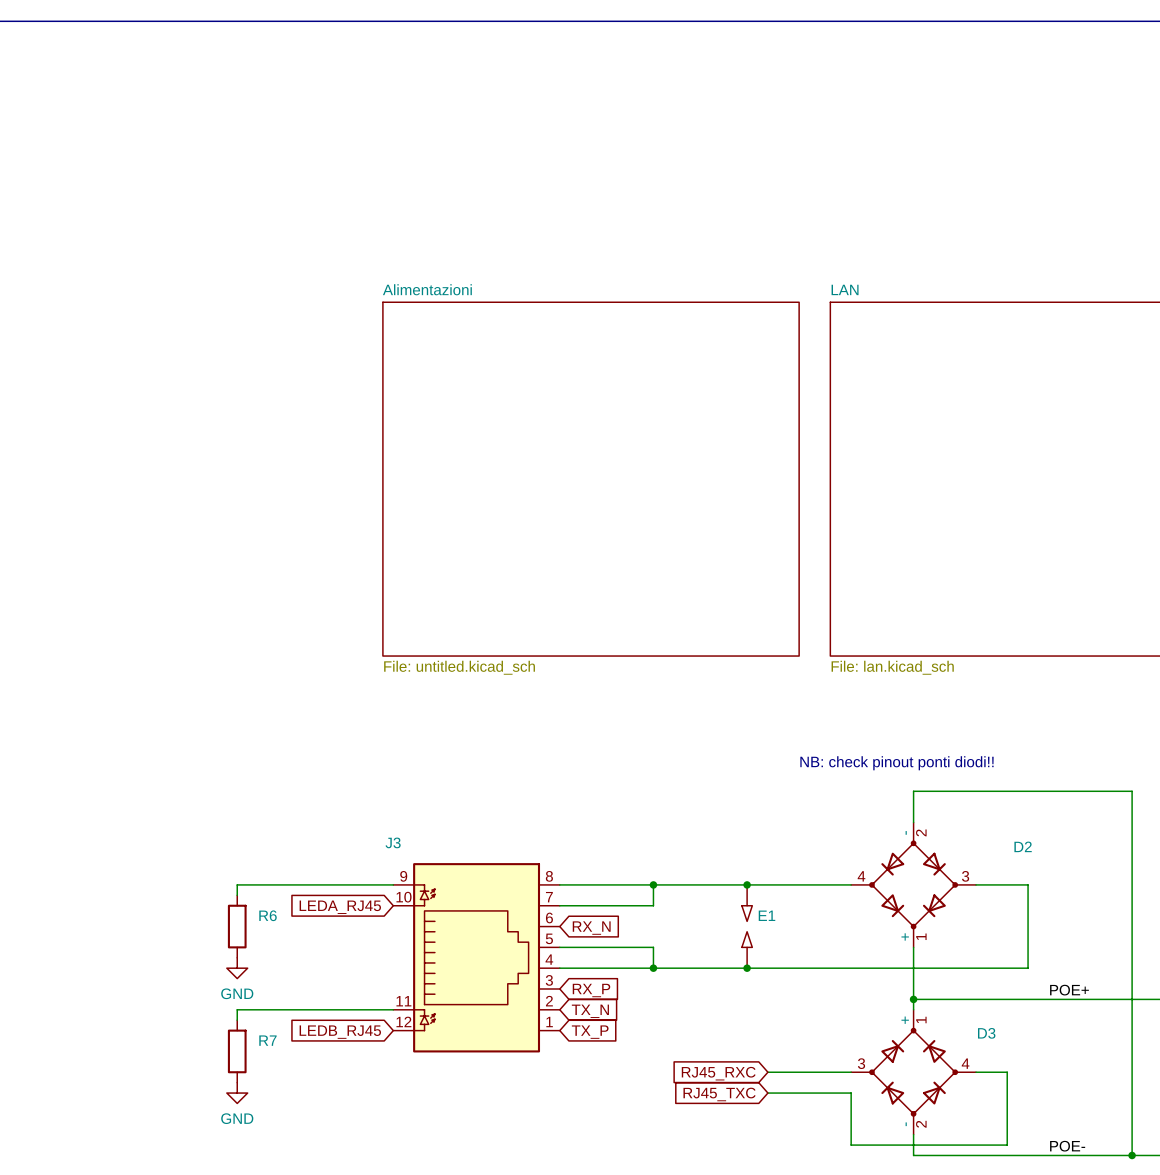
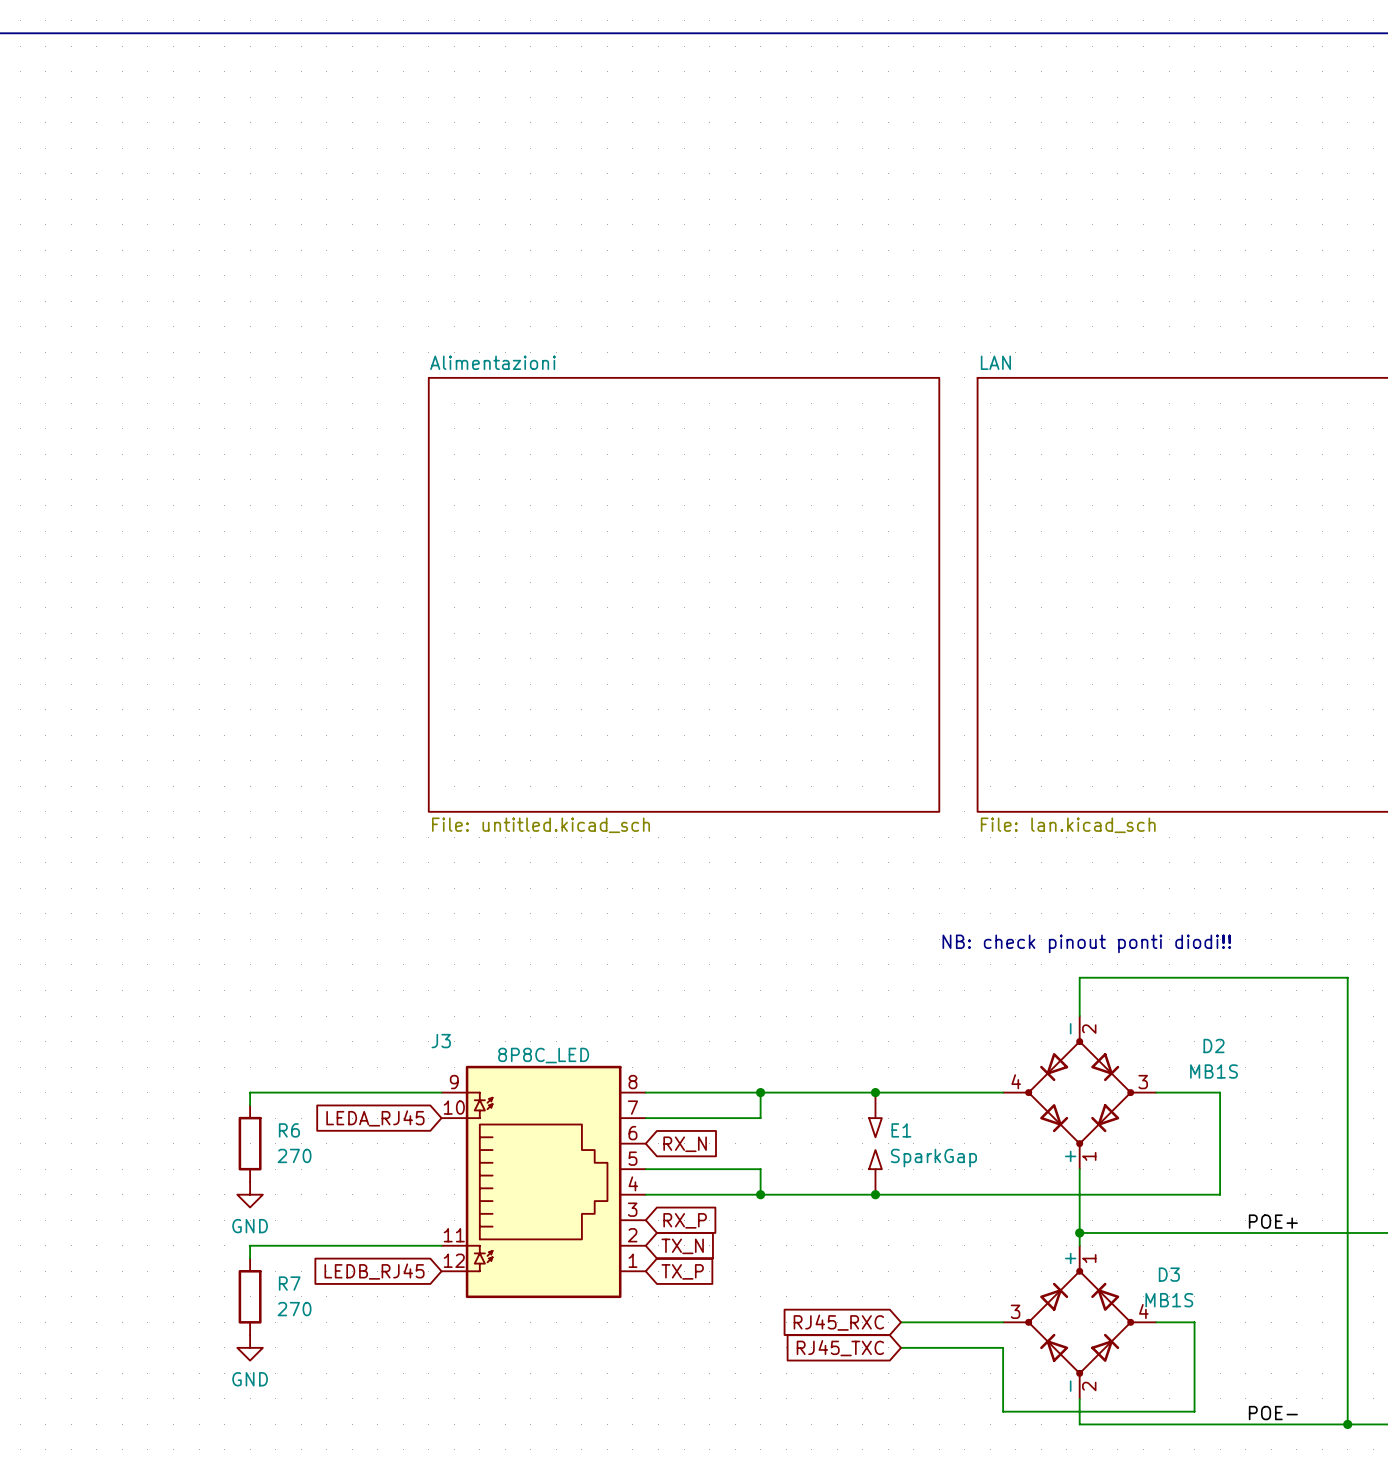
J3 value: none -> 8P8C_LED (543, 1055)
D2 value: none -> MB1S (1214, 1071)
R6 value: none -> 270 (294, 1155)
E1 value: none -> SparkGap (933, 1158)
D3 value: none -> MB1S (1169, 1300)
R7 value: none -> 270 (294, 1309)

